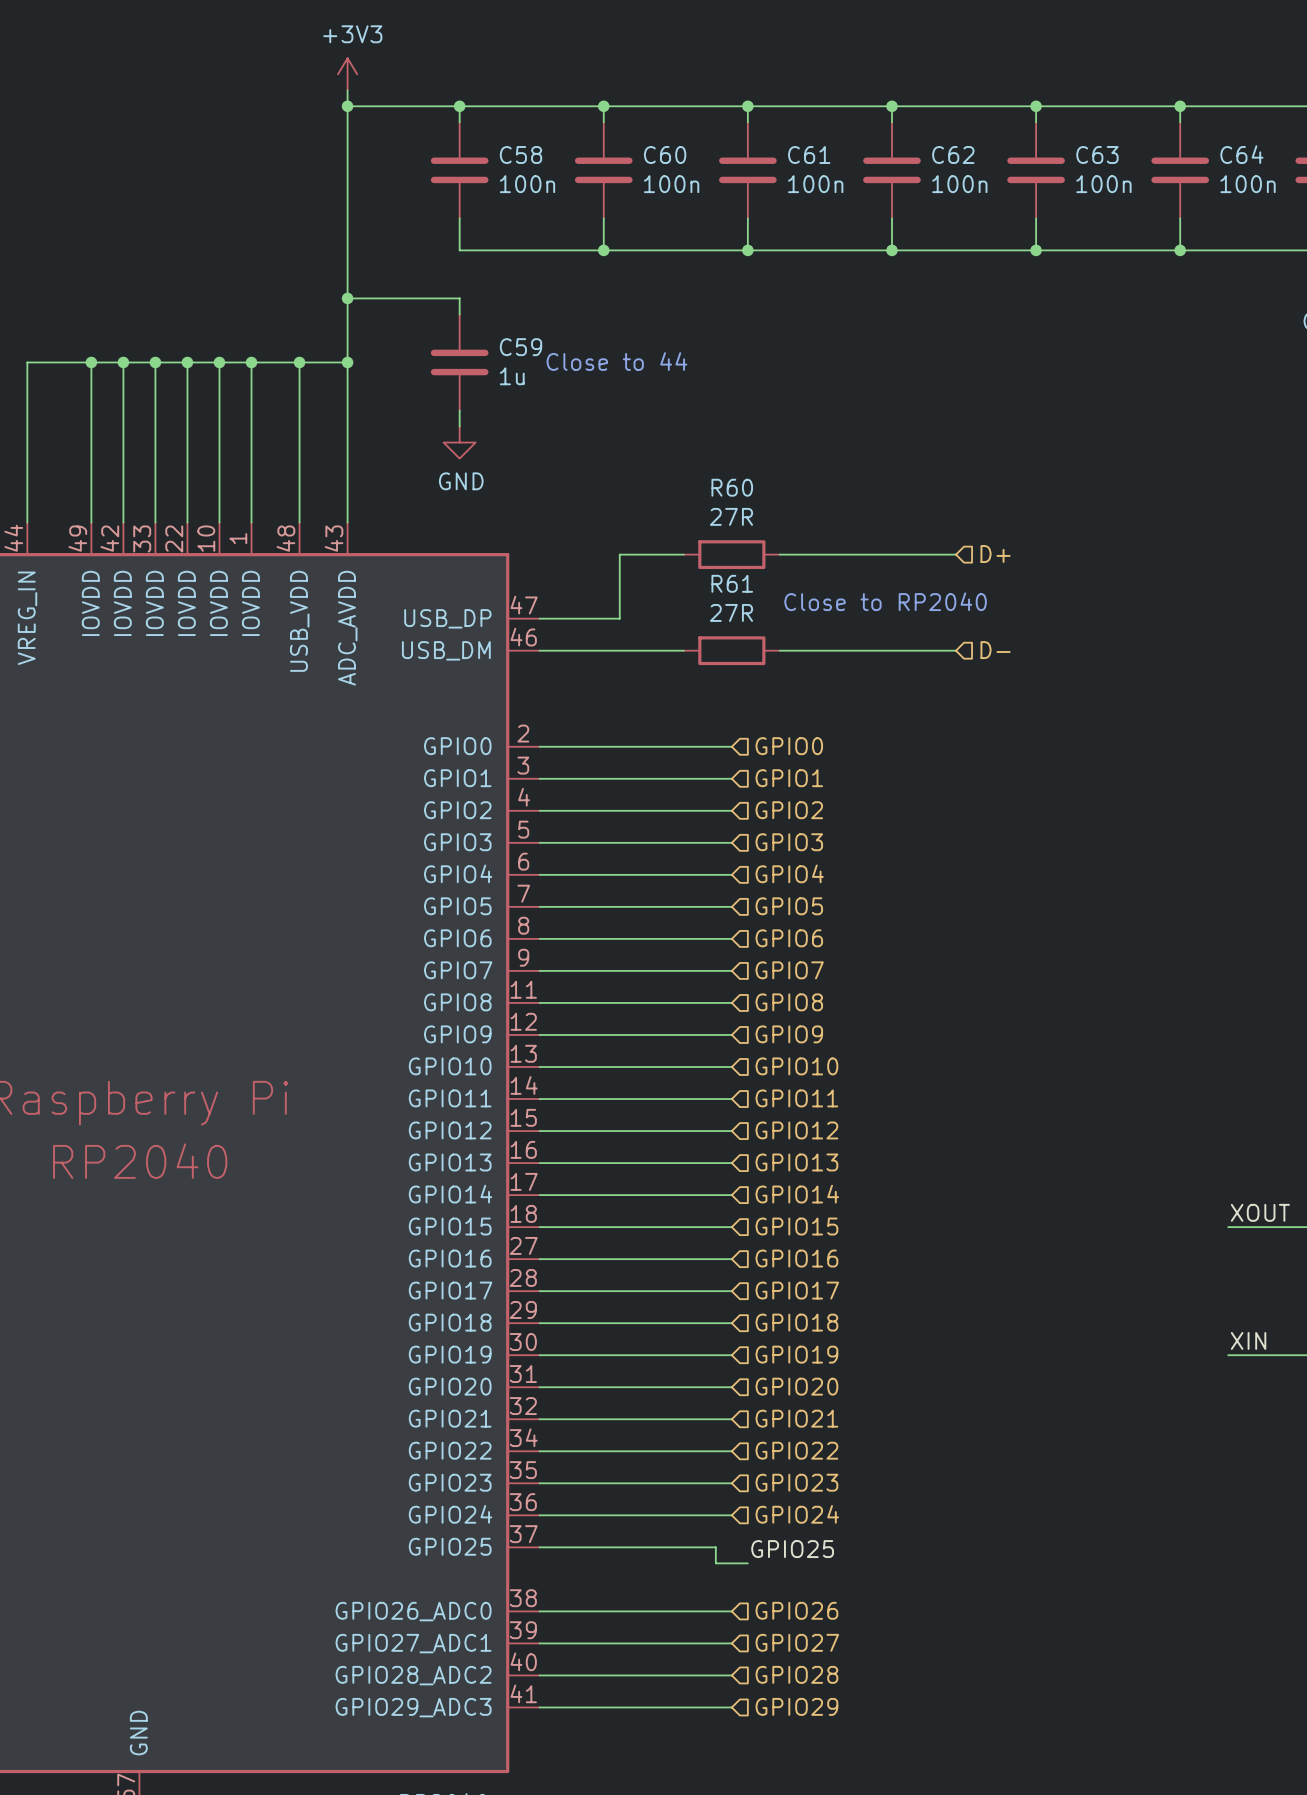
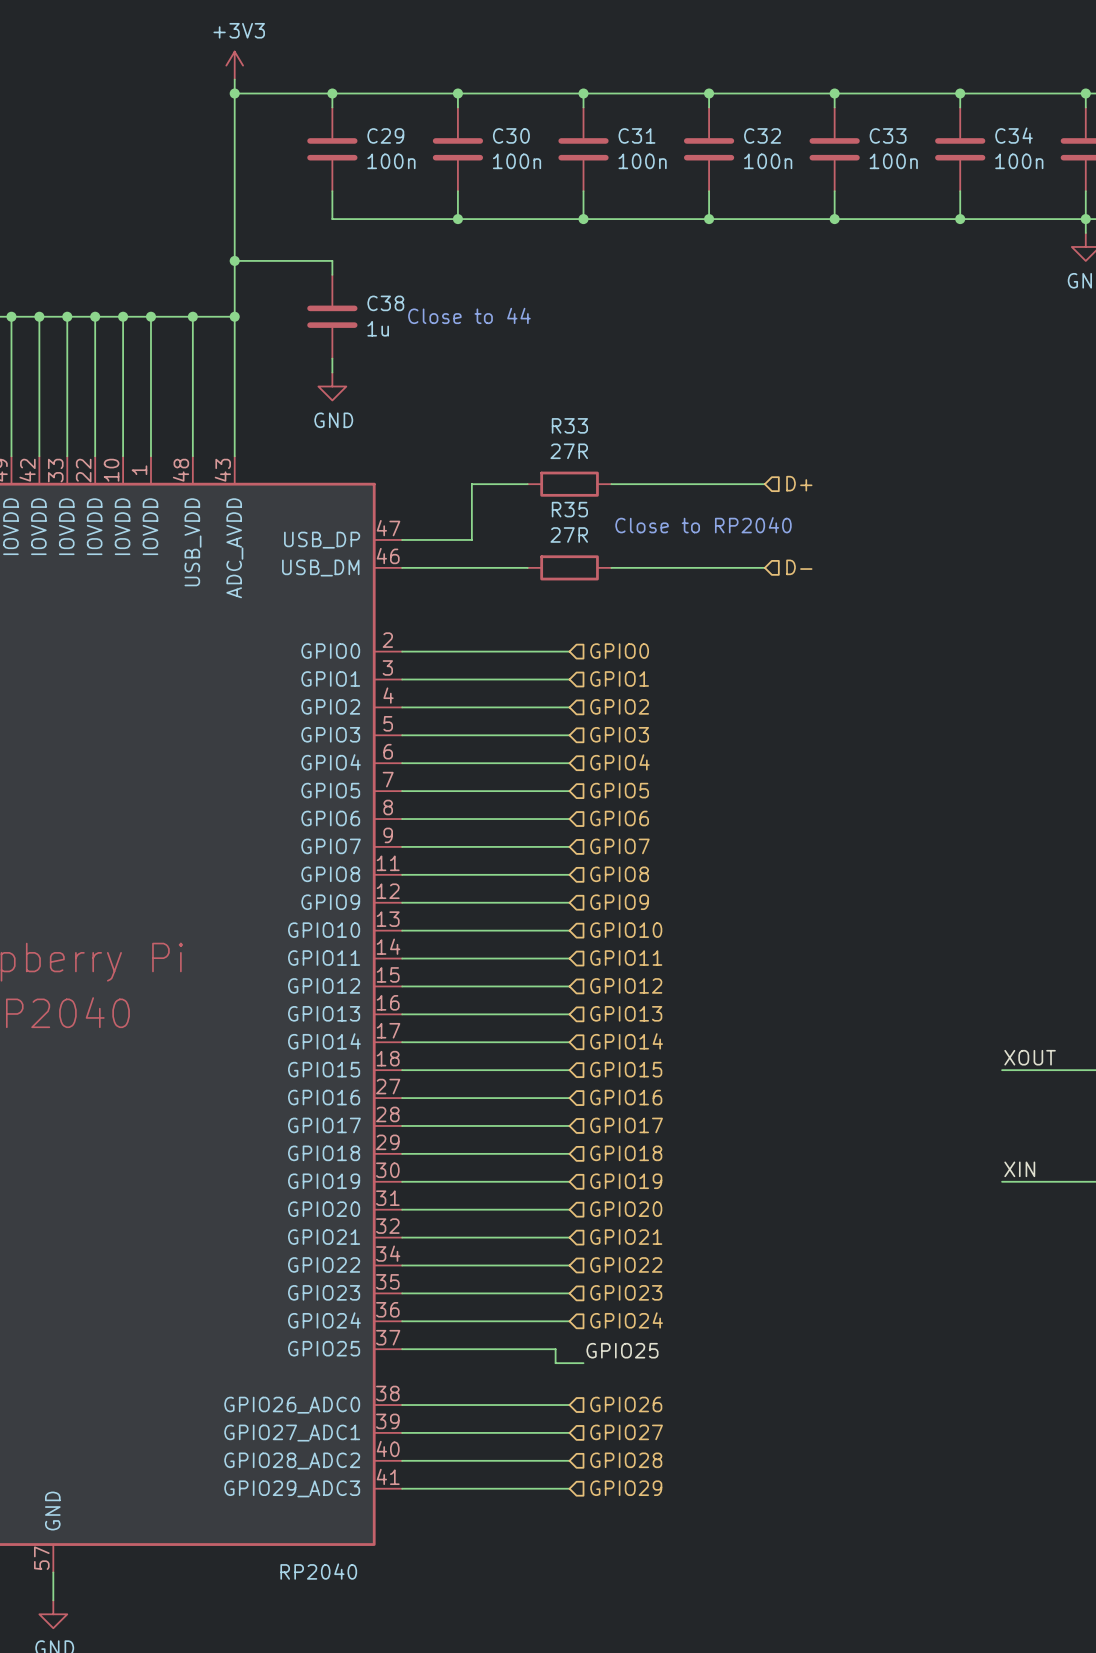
C64 name: C64 (1241, 154) -> C34 (1014, 135)
C58 name: C58 (521, 155) -> C29 (385, 135)
C60 name: C60 (665, 155) -> C30 (511, 135)
C61 name: C61 (809, 155) -> C31 (636, 135)
C62 name: C62 (953, 155) -> C32 (762, 135)
C63 name: C63 (1097, 155) -> C33 (888, 135)
C59 name: C59 (521, 347) -> C38 (385, 303)
R60 name: R60 (732, 487) -> R33 (569, 425)
R61 name: R61 (732, 583) -> R35 (569, 509)

